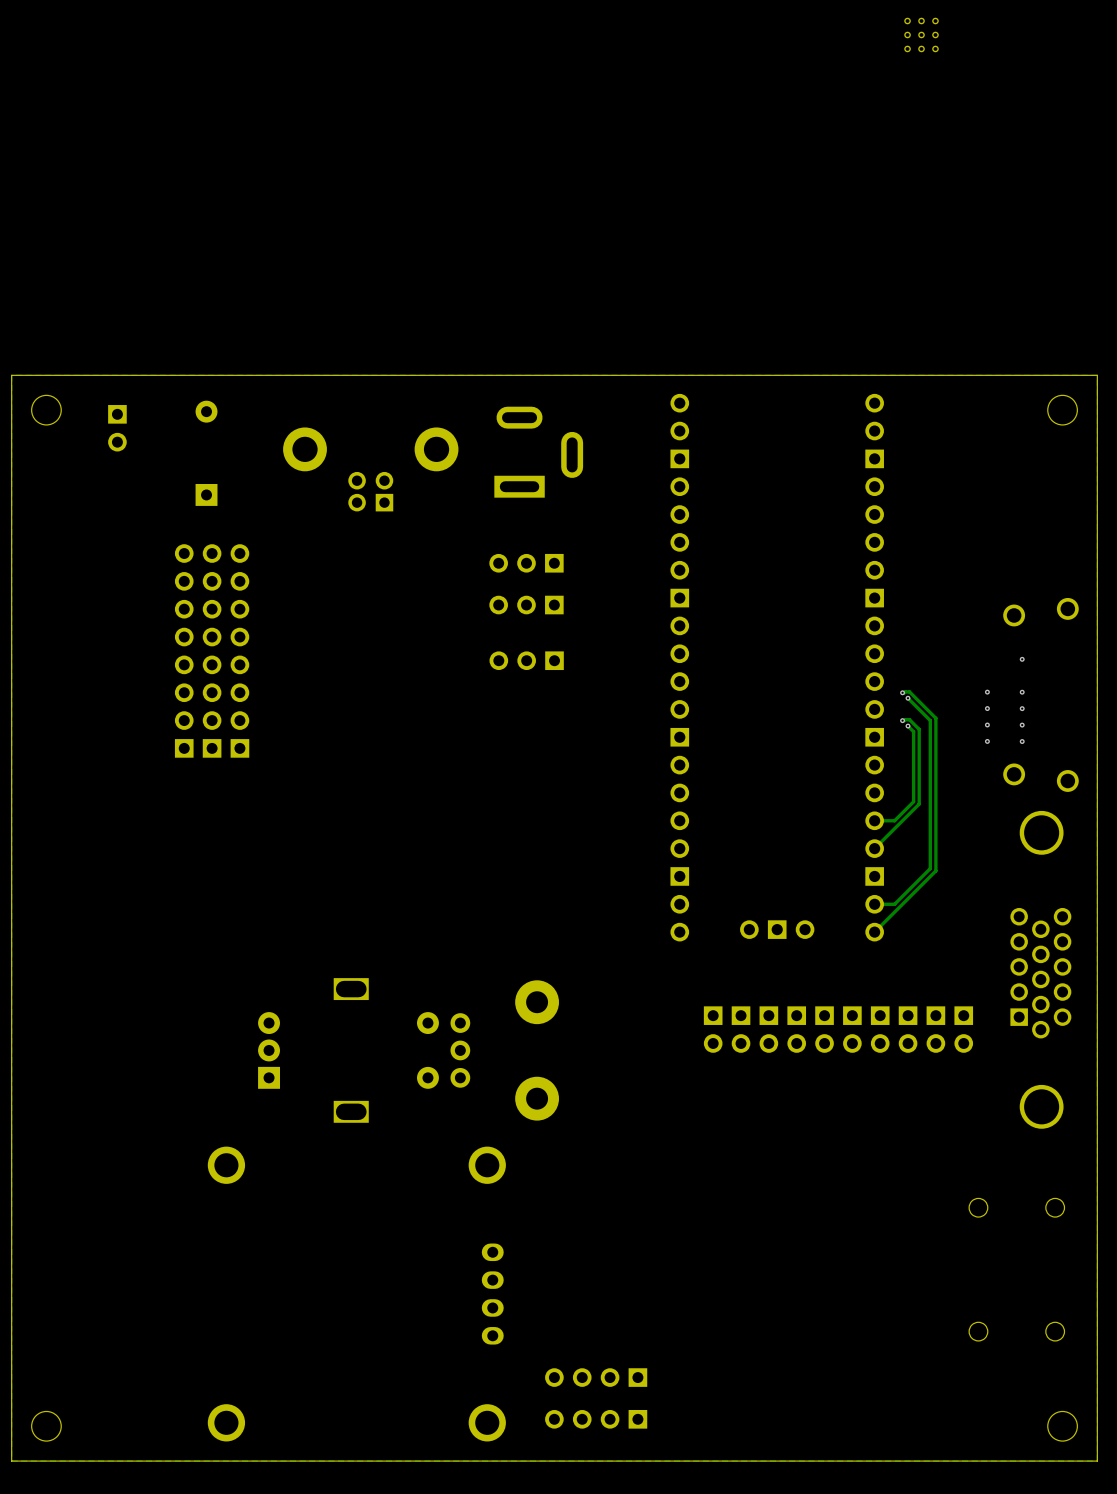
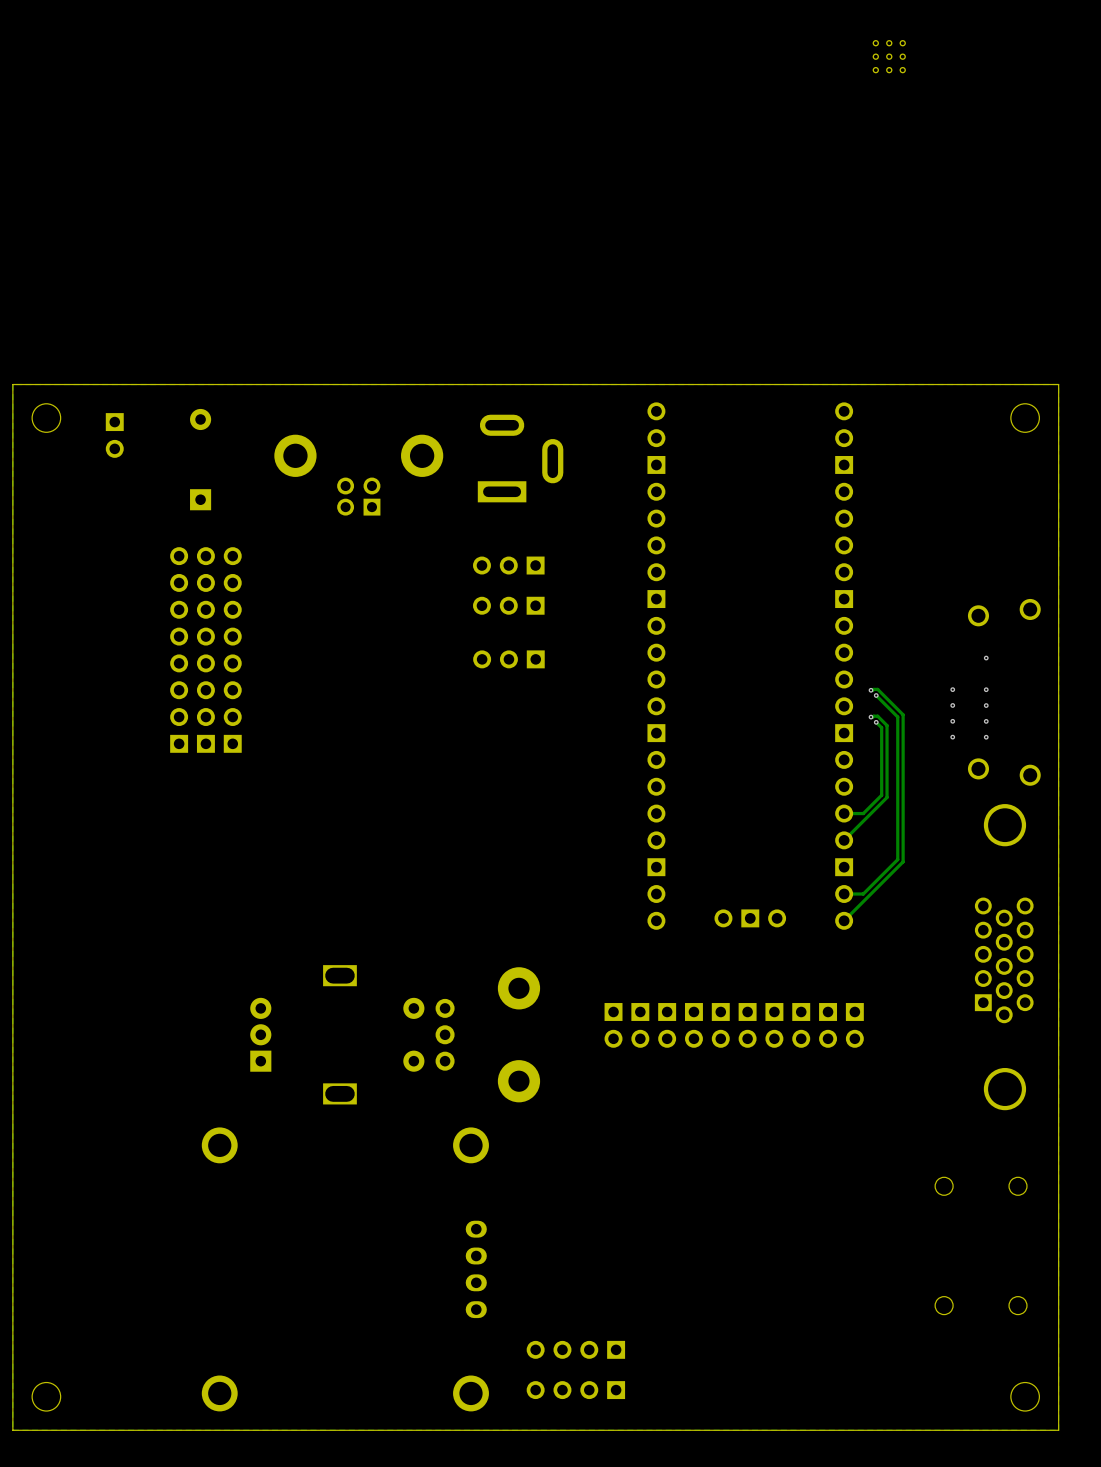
part: (713, 1029) -> none
part: (741, 1029) -> none
part: (768, 1029) -> none
part: (796, 1029) -> none
part: (824, 1029) -> none
part: (852, 1029) -> none
part: (880, 1029) -> none
part: (908, 1029) -> none
part: (935, 1029) -> none
part: (963, 1029) -> none
part: none -> (613, 1025)
part: none -> (640, 1025)
part: none -> (667, 1025)
part: none -> (693, 1025)
part: none -> (720, 1025)
part: none -> (747, 1025)
part: none -> (774, 1025)
part: none -> (801, 1025)
part: none -> (828, 1025)
part: none -> (854, 1025)

